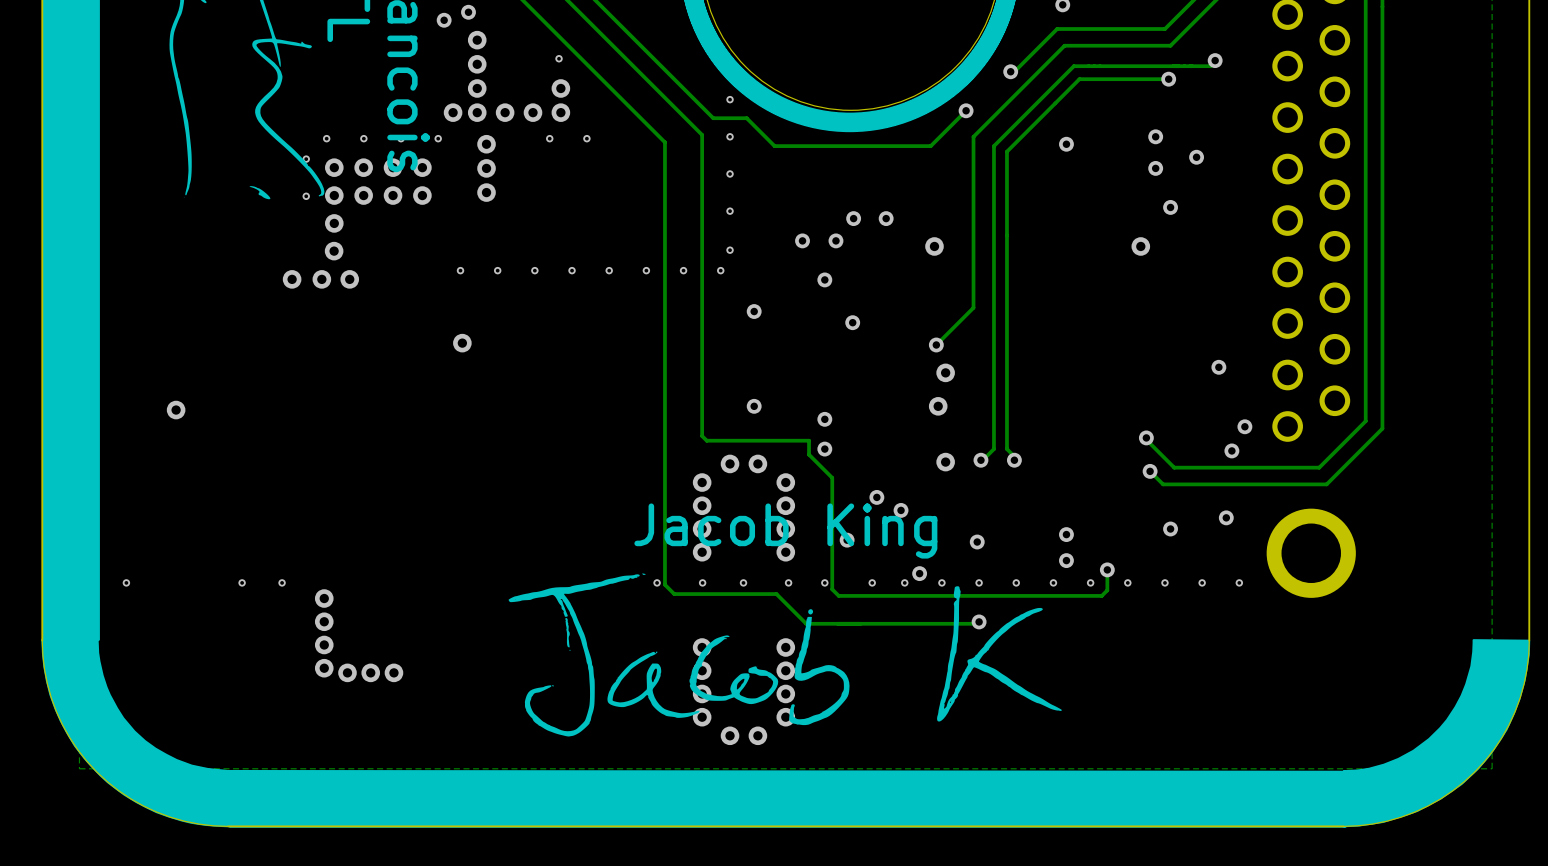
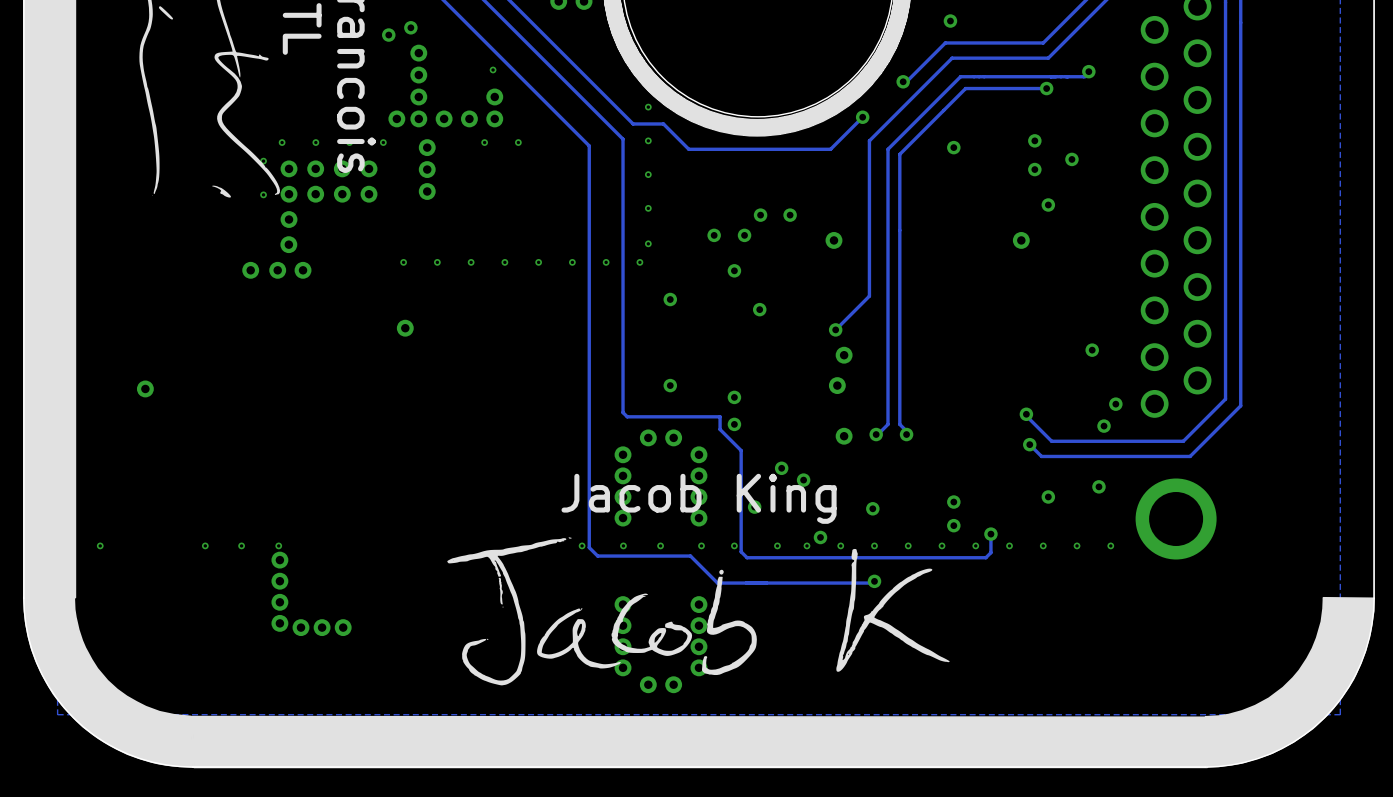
via: none -> (278, 545)

